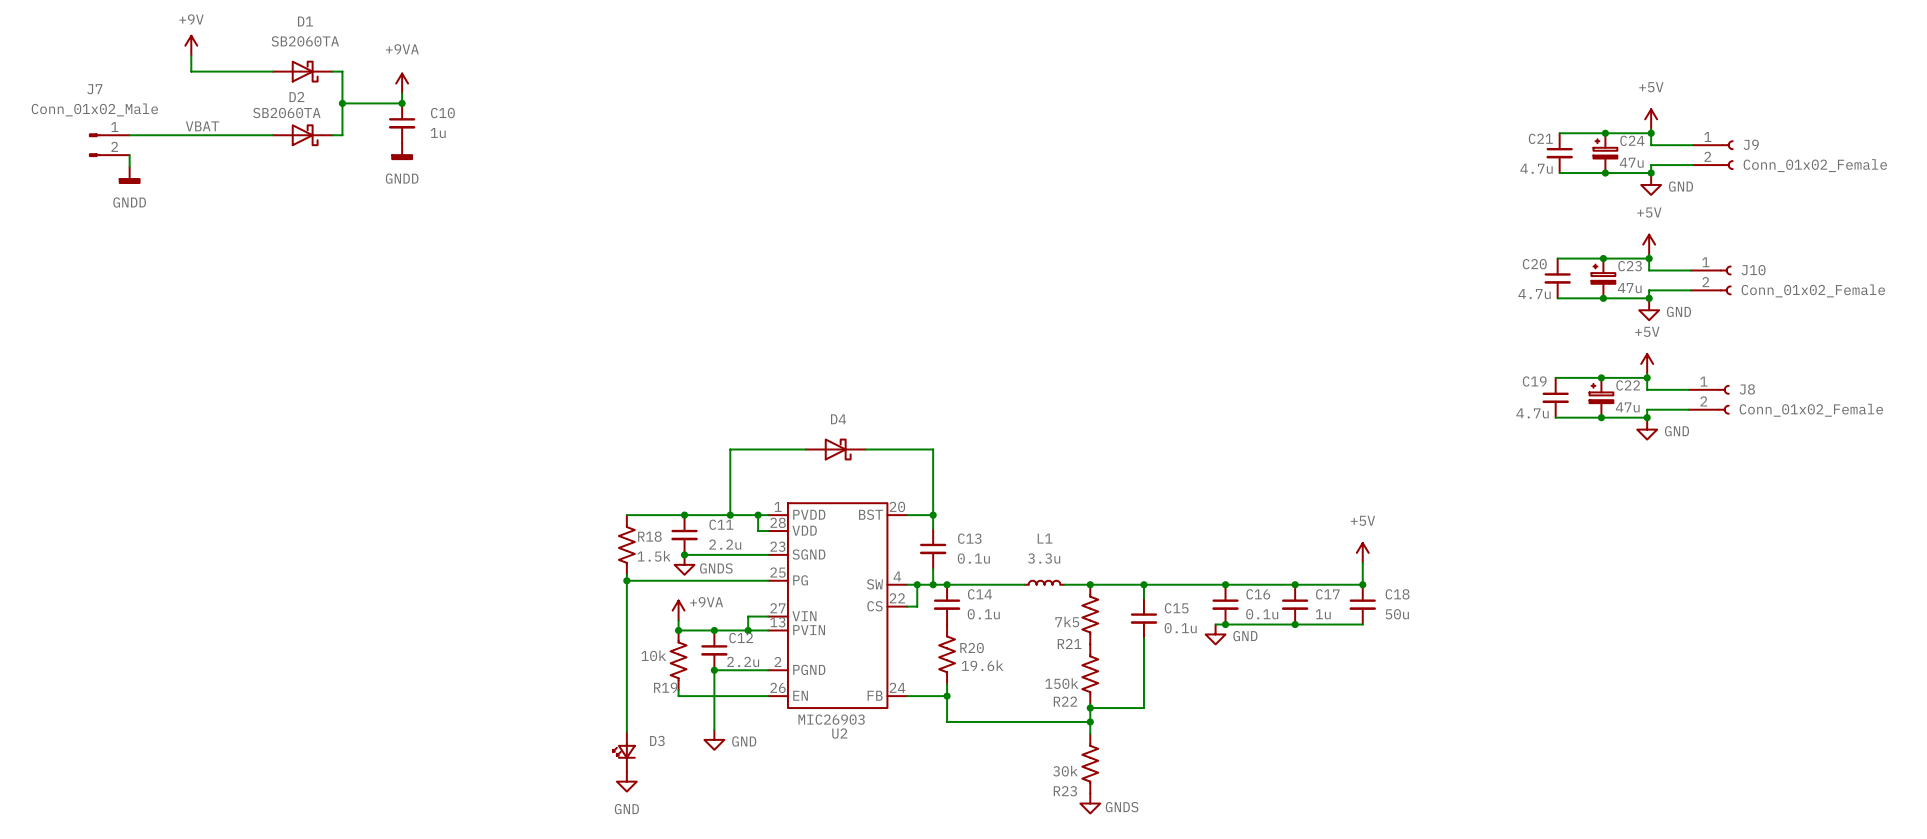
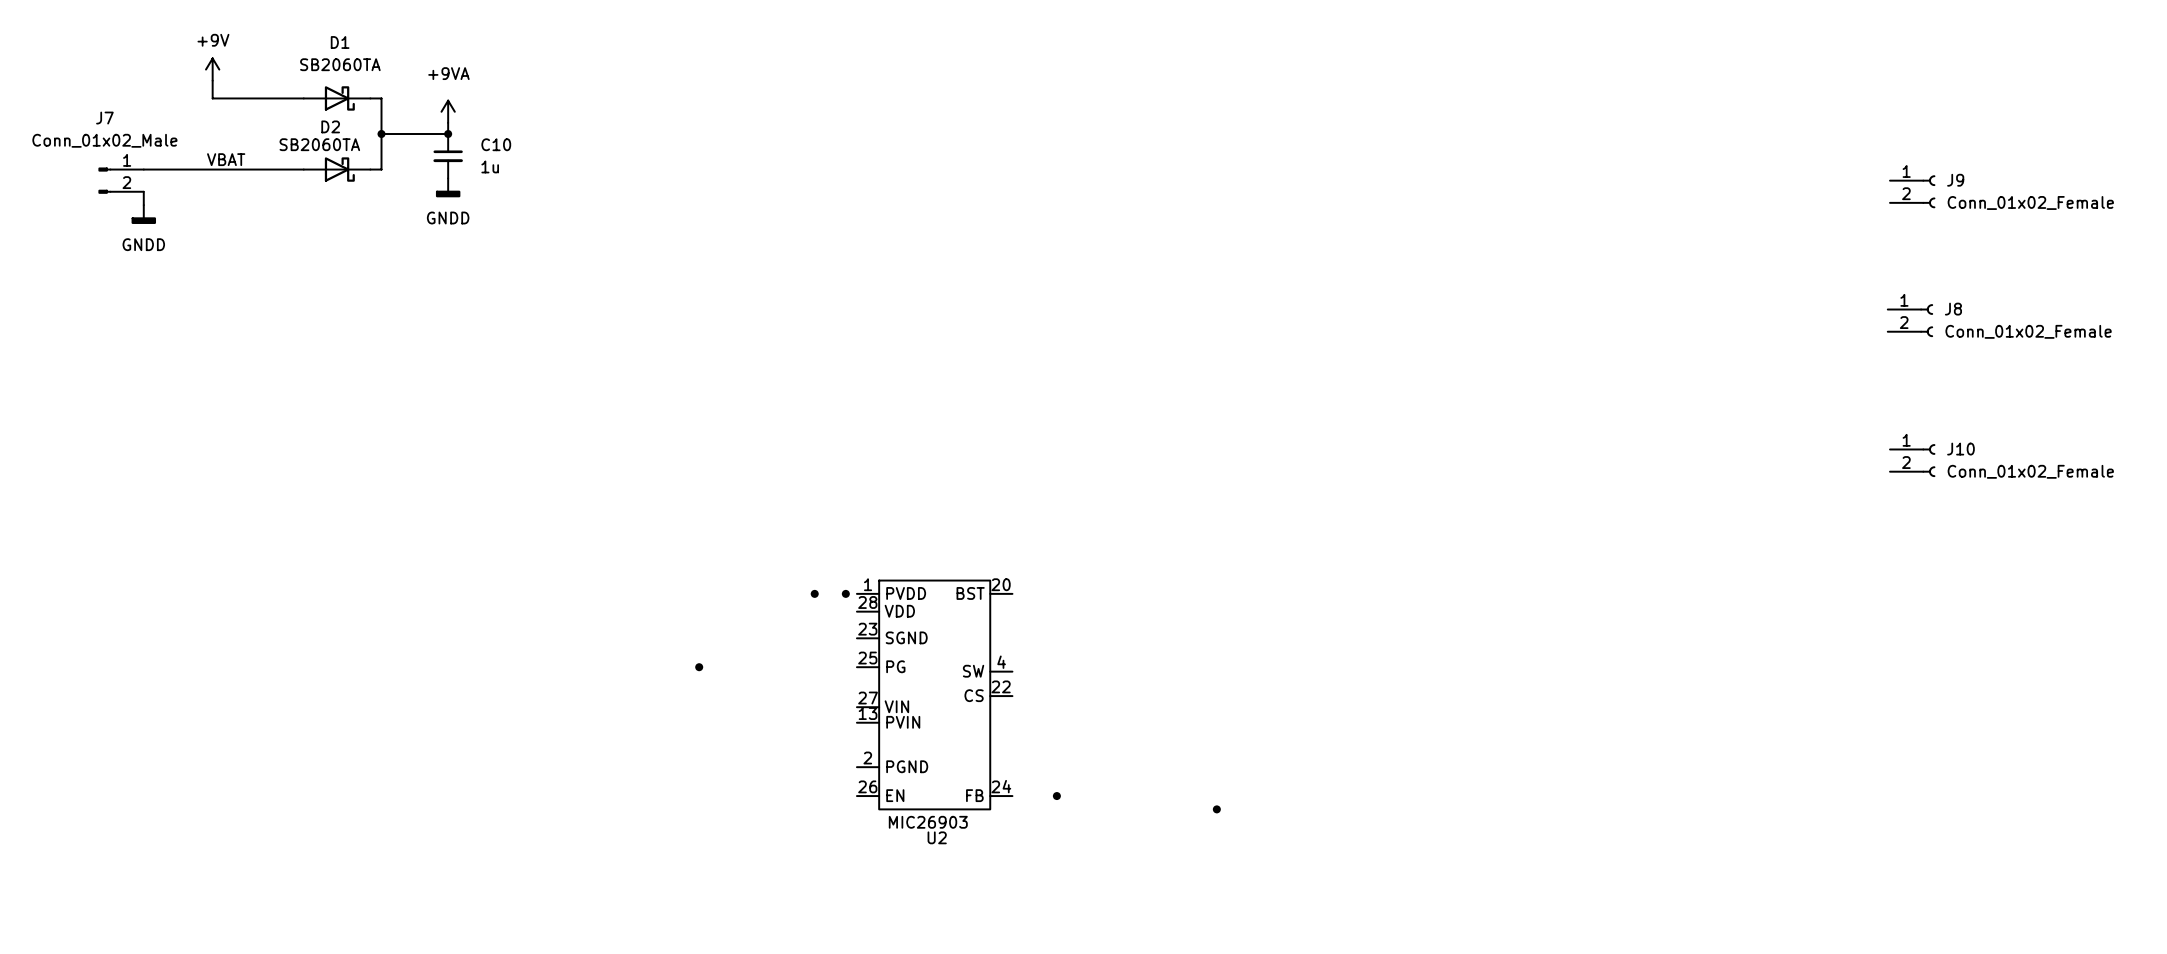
power symbol: +5V (1651, 119) -> none
wire: (1651, 129) (1651, 145) (1692, 145) -> none
wire: (1559, 133) (1651, 133) -> none
junction: (1605, 133) -> none
junction: (1651, 133) -> none
C21: 4.7u (1559, 153) -> none
C24: 47u (1605, 153) -> none
wire: (1692, 165) (1651, 165) (1651, 175) -> none
wire: (1559, 173) (1651, 173) -> none
junction: (1605, 173) -> none
junction: (1651, 173) -> none
power symbol: GND (1651, 184) -> none
power symbol: +5V (1649, 244) -> none
wire: (1649, 254) (1649, 270) (1690, 270) -> none
wire: (1557, 258) (1649, 258) -> none
junction: (1603, 258) -> none
junction: (1649, 258) -> none
C20: 4.7u (1557, 278) -> none
C23: 47u (1603, 278) -> none
J10 position: (1711, 280) -> (1912, 460)
wire: (1690, 290) (1649, 290) (1649, 300) -> none
wire: (1557, 298) (1649, 298) -> none
junction: (1603, 298) -> none
junction: (1649, 298) -> none
power symbol: GND (1649, 310) -> none
power symbol: +5V (1647, 363) -> none
wire: (1647, 373) (1647, 389) (1688, 389) -> none
wire: (1555, 377) (1647, 377) -> none
junction: (1601, 377) -> none
junction: (1647, 377) -> none
C19: 4.7u (1555, 397) -> none
C22: 47u (1601, 397) -> none
J8 position: (1709, 399) -> (1910, 320)
wire: (1688, 409) (1647, 409) (1647, 419) -> none
wire: (1555, 417) (1647, 417) -> none
junction: (1601, 417) -> none
junction: (1647, 417) -> none
power symbol: GND (1647, 429) -> none
wire: (805, 449) (730, 449) (730, 515) -> none
D4: (835, 449) -> none
wire: (865, 449) (933, 449) (933, 529) -> none
wire: (626, 515) (768, 515) -> none
junction: (684, 515) -> none
wire: (758, 515) (758, 531) (768, 531) -> none
wire: (907, 515) (933, 515) -> none
junction: (933, 515) -> none
C11: 2.2u (684, 535) -> none
R18: 1.5k (626, 544) -> none
C13: 0.1u (933, 548) -> none
power symbol: +5V (1362, 552) -> none
wire: (684, 554) (768, 554) -> none
junction: (684, 554) -> none
wire: (1362, 562) (1362, 584) (1064, 584) -> none
power symbol: GNDS (684, 564) -> none
wire: (933, 568) (933, 584) -> none
wire: (626, 574) (626, 731) -> none
wire: (626, 580) (768, 580) -> none
L1: 3.3u (1044, 582) -> none
wire: (907, 584) (1024, 584) -> none
wire: (917, 584) (917, 606) (907, 606) -> none
junction: (917, 584) -> none
junction: (933, 584) -> none
junction: (947, 584) -> none
junction: (1090, 584) -> none
wire: (1143, 584) (1143, 598) -> none
junction: (1143, 584) -> none
junction: (1225, 584) -> none
junction: (1295, 584) -> none
junction: (1362, 584) -> none
C14: 0.1u (947, 604) -> none
C16: 0.1u (1225, 604) -> none
C17: 1u (1295, 604) -> none
C18: 50u (1362, 604) -> none
power symbol: +9VA (678, 610) -> none
R21: 7k5 (1090, 614) -> none
wire: (768, 616) (748, 616) (748, 630) -> none
C15: 0.1u (1143, 618) -> none
wire: (678, 620) (678, 630) (768, 630) -> none
wire: (1215, 624) (1362, 624) -> none
junction: (1225, 624) -> none
junction: (1295, 624) -> none
junction: (678, 630) -> none
junction: (714, 630) -> none
junction: (748, 630) -> none
power symbol: GND (1215, 634) -> none
wire: (1143, 638) (1143, 708) (1090, 708) -> none
C12: 2.2u (714, 650) -> none
R20: 19.6k (947, 654) -> none
R19: 10k (678, 660) -> none
junction: (714, 670) -> none
wire: (768, 670) (714, 670) (714, 729) -> none
R22: 150k (1090, 674) -> none
wire: (947, 684) (947, 721) (1090, 721) -> none
wire: (678, 690) (678, 696) (768, 696) -> none
wire: (907, 696) (947, 696) -> none
wire: (1090, 704) (1090, 733) -> none
junction: (1090, 721) -> none
power symbol: GND (714, 739) -> none
D3: (624, 751) -> none
R23: 30k (1090, 763) -> none
power symbol: GND (626, 781) -> none
power symbol: GNDS (1090, 803) -> none

